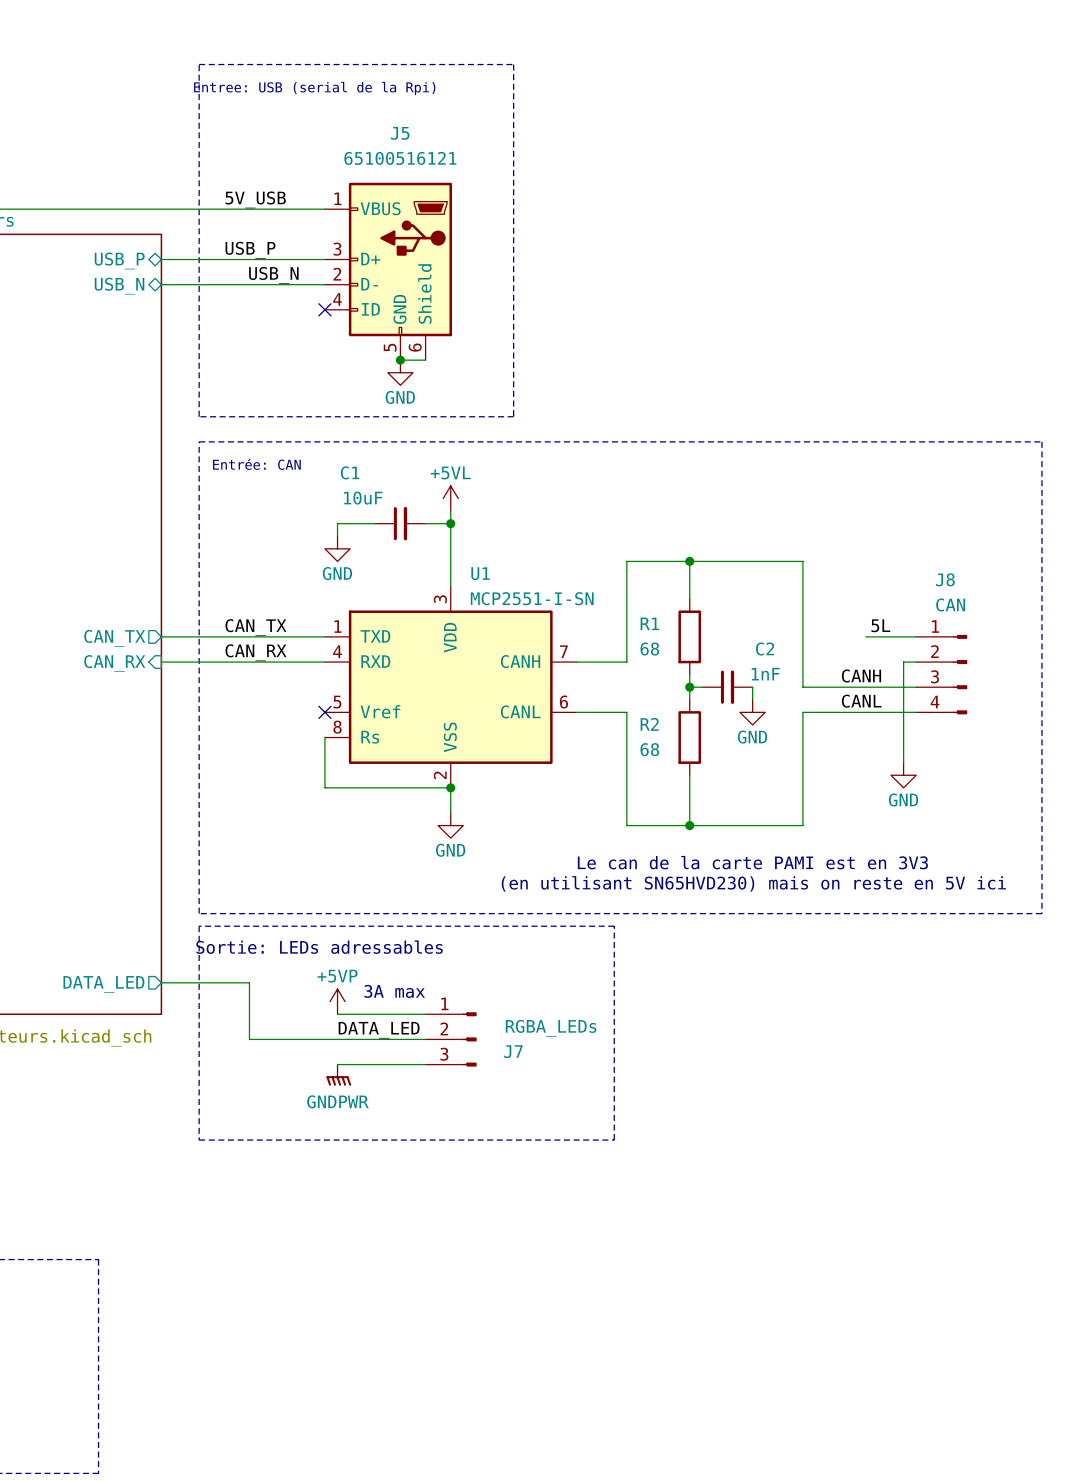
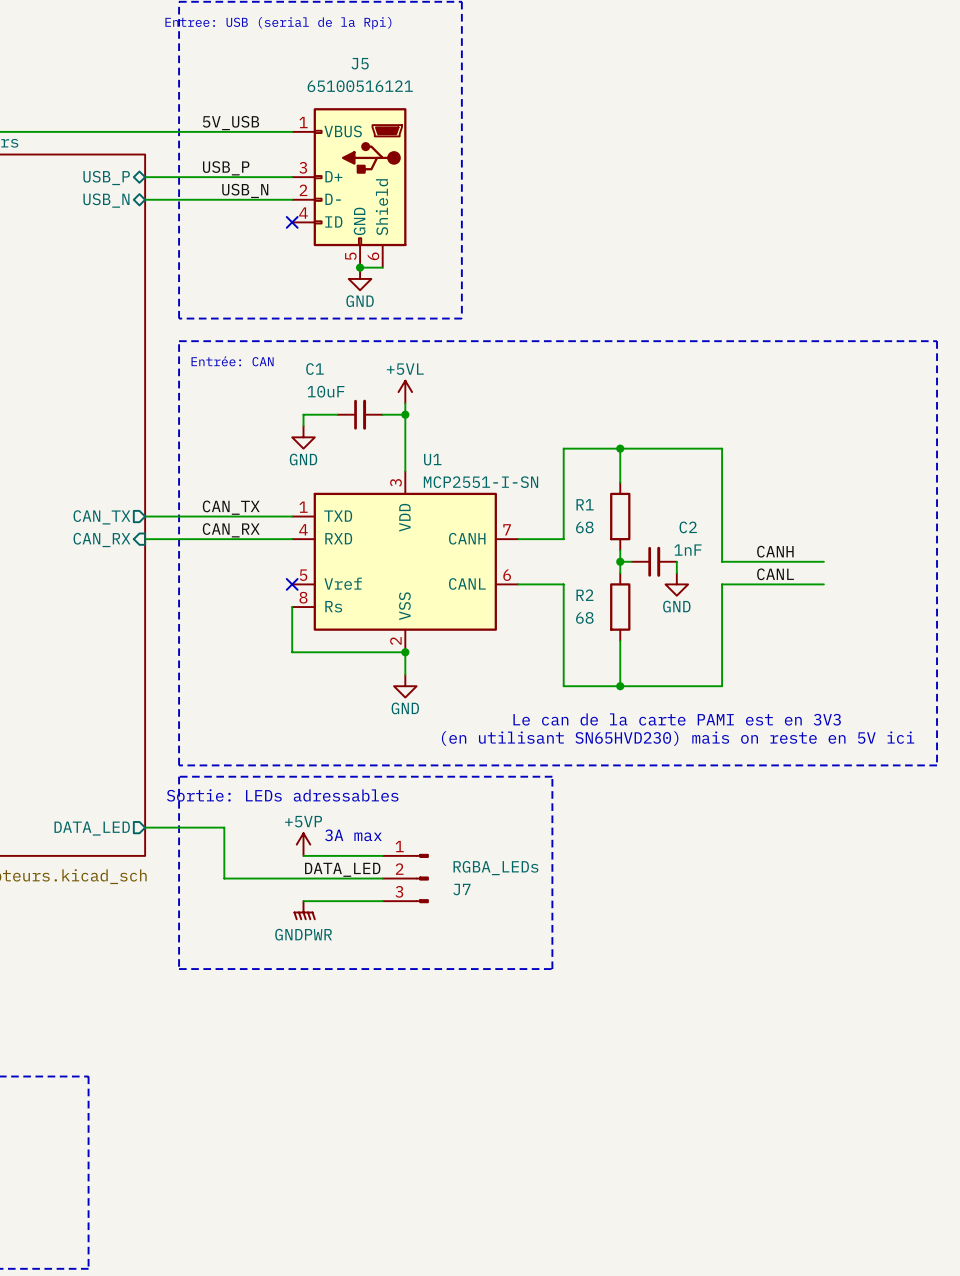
label: 5L (880, 625) -> none
wire: (865, 636) (916, 636) -> none
wire: (916, 662) (903, 662) (903, 762) -> none
J8: CAN (941, 674) -> none
power symbol: GND (903, 775) -> none

